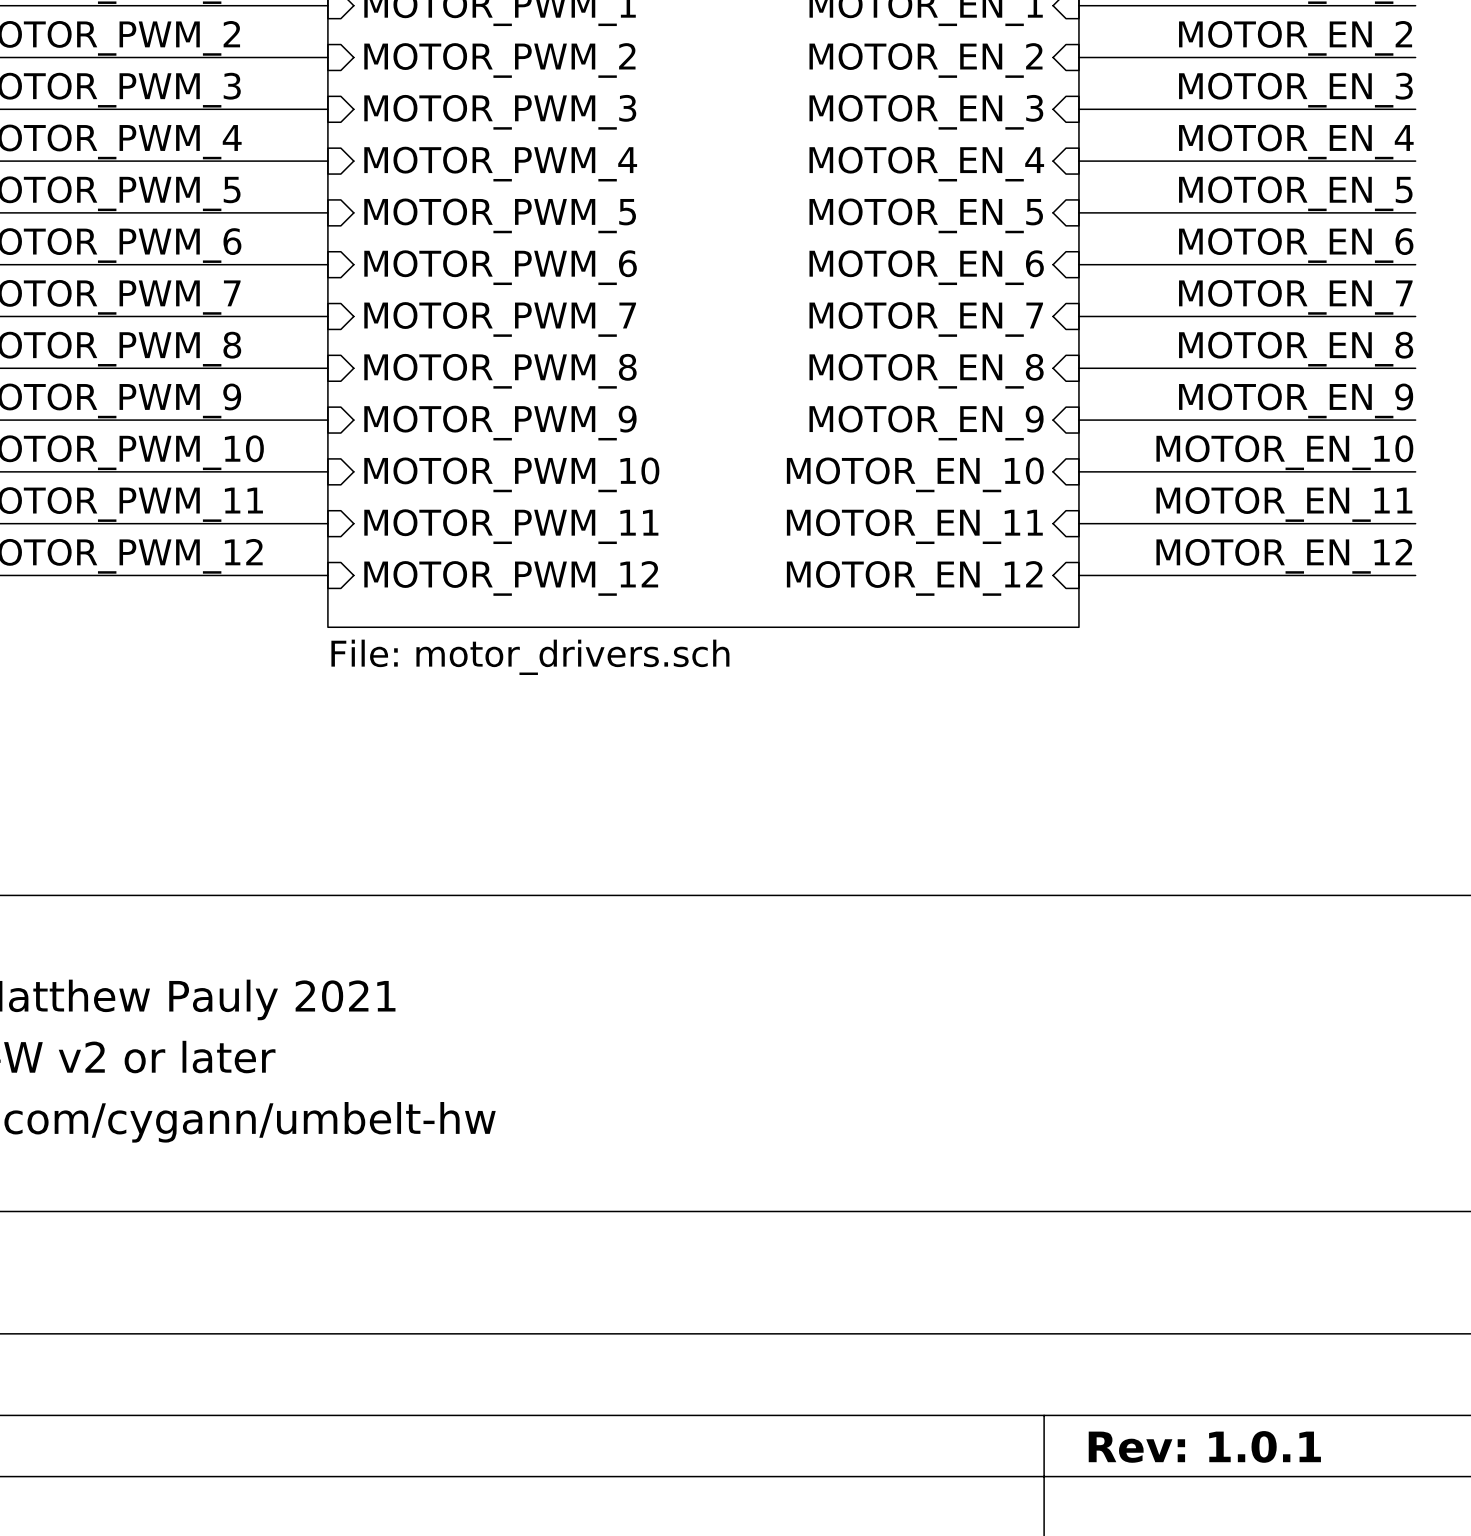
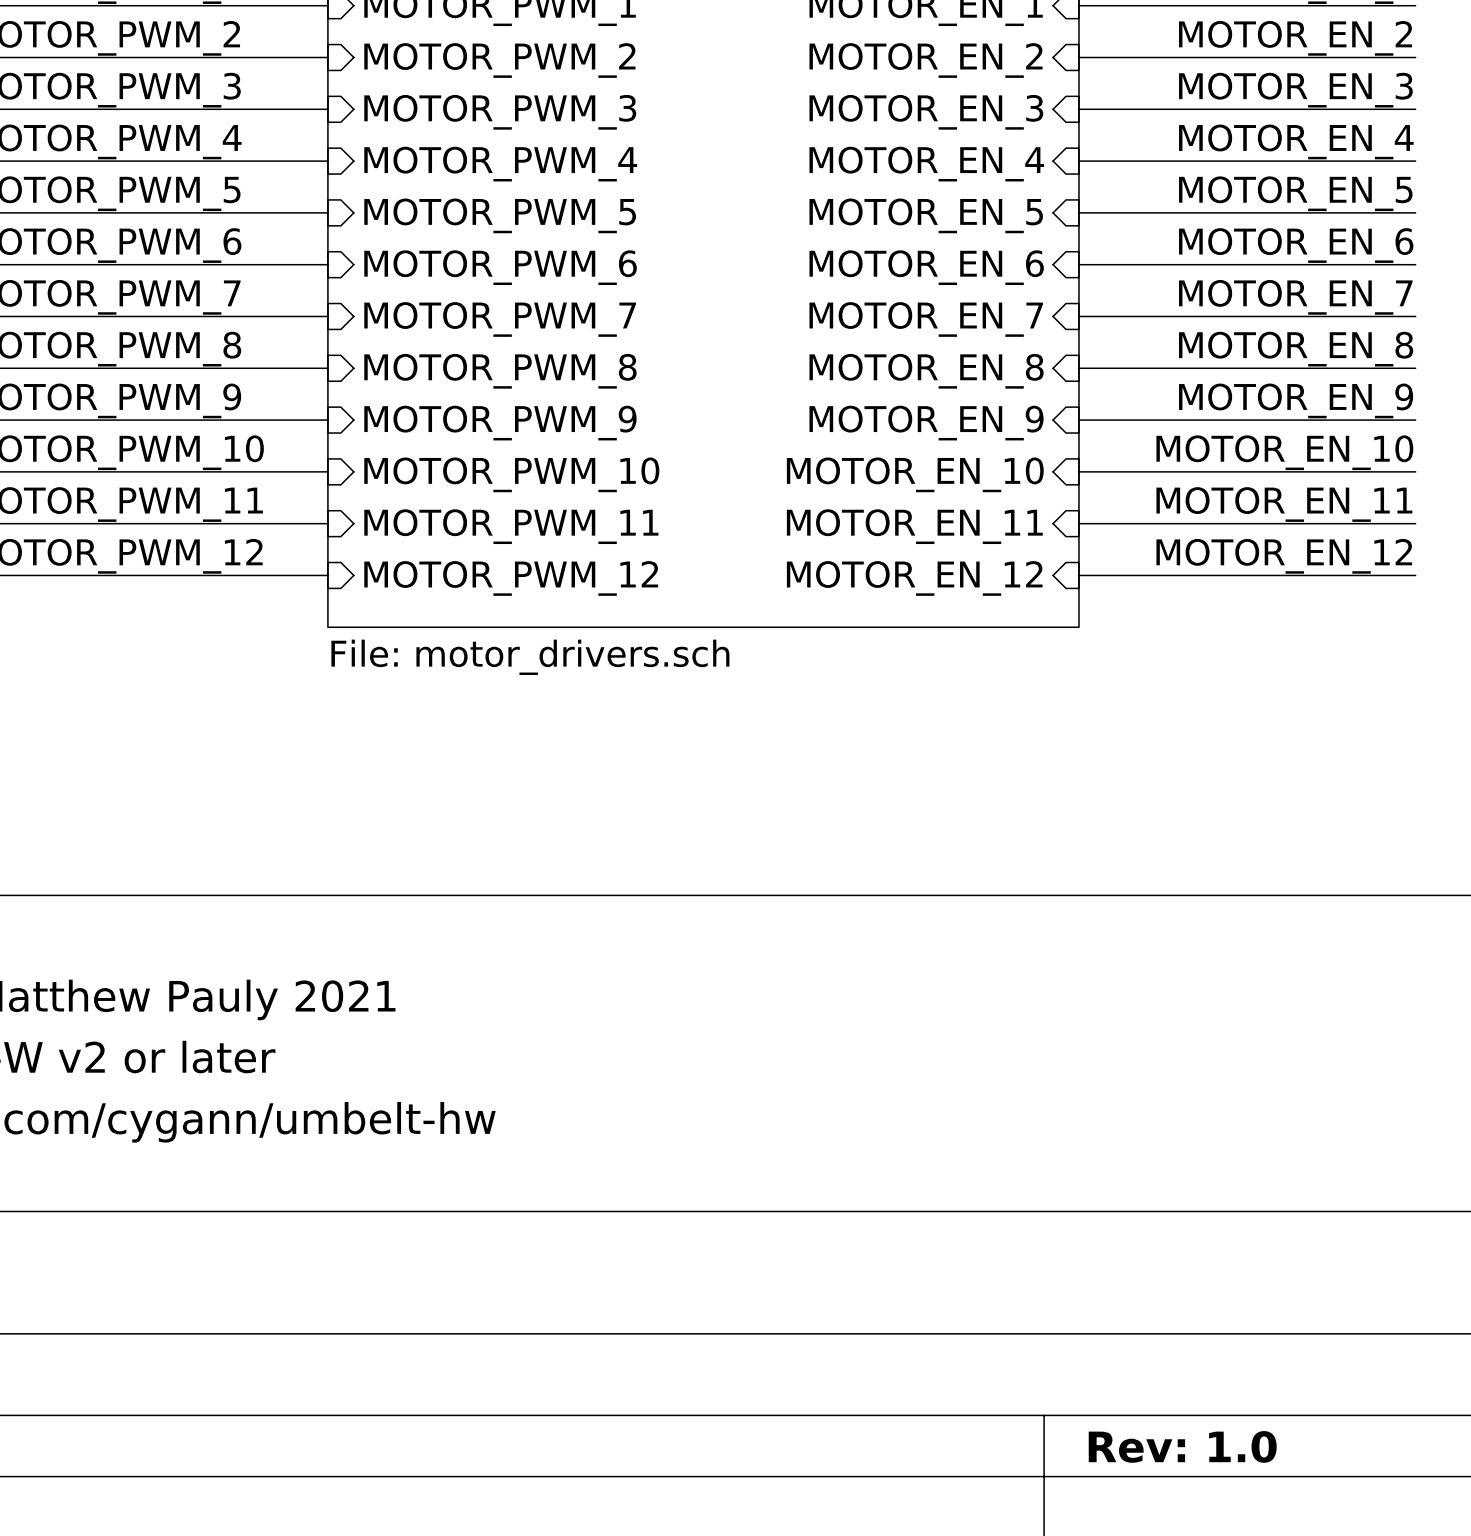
title block: Rev: 1.0.1 (1204, 1446) -> Rev: 1.0 (1182, 1446)

